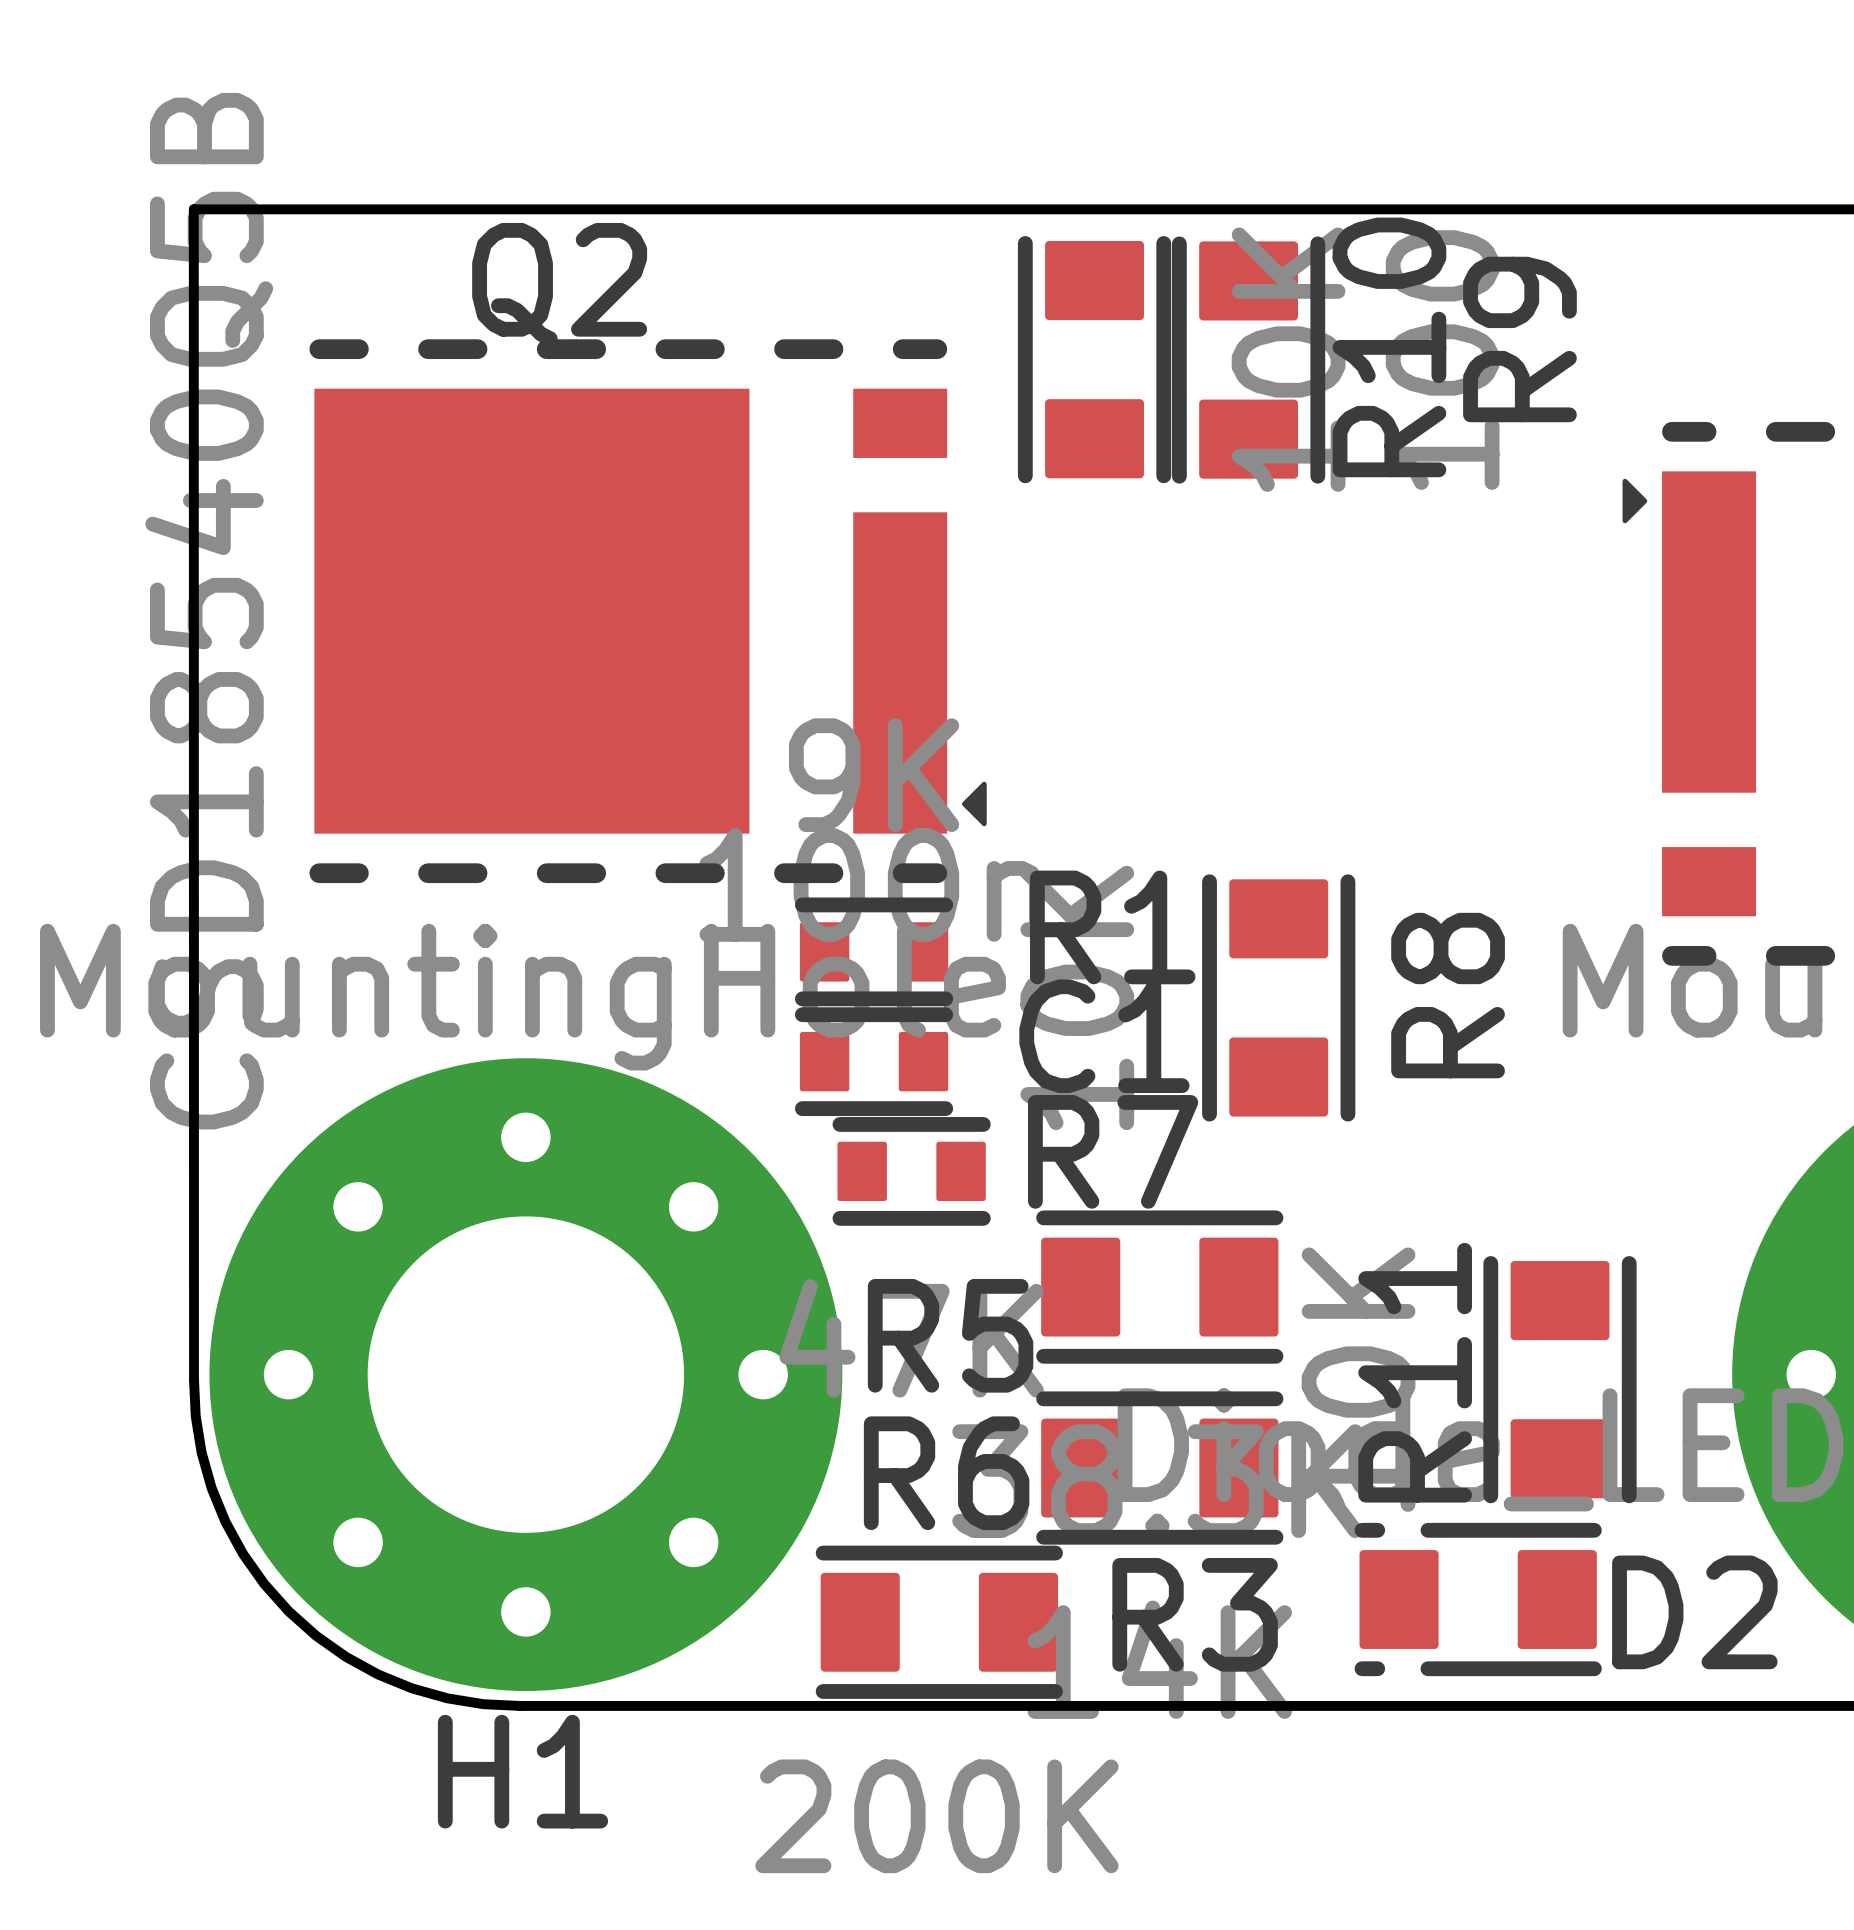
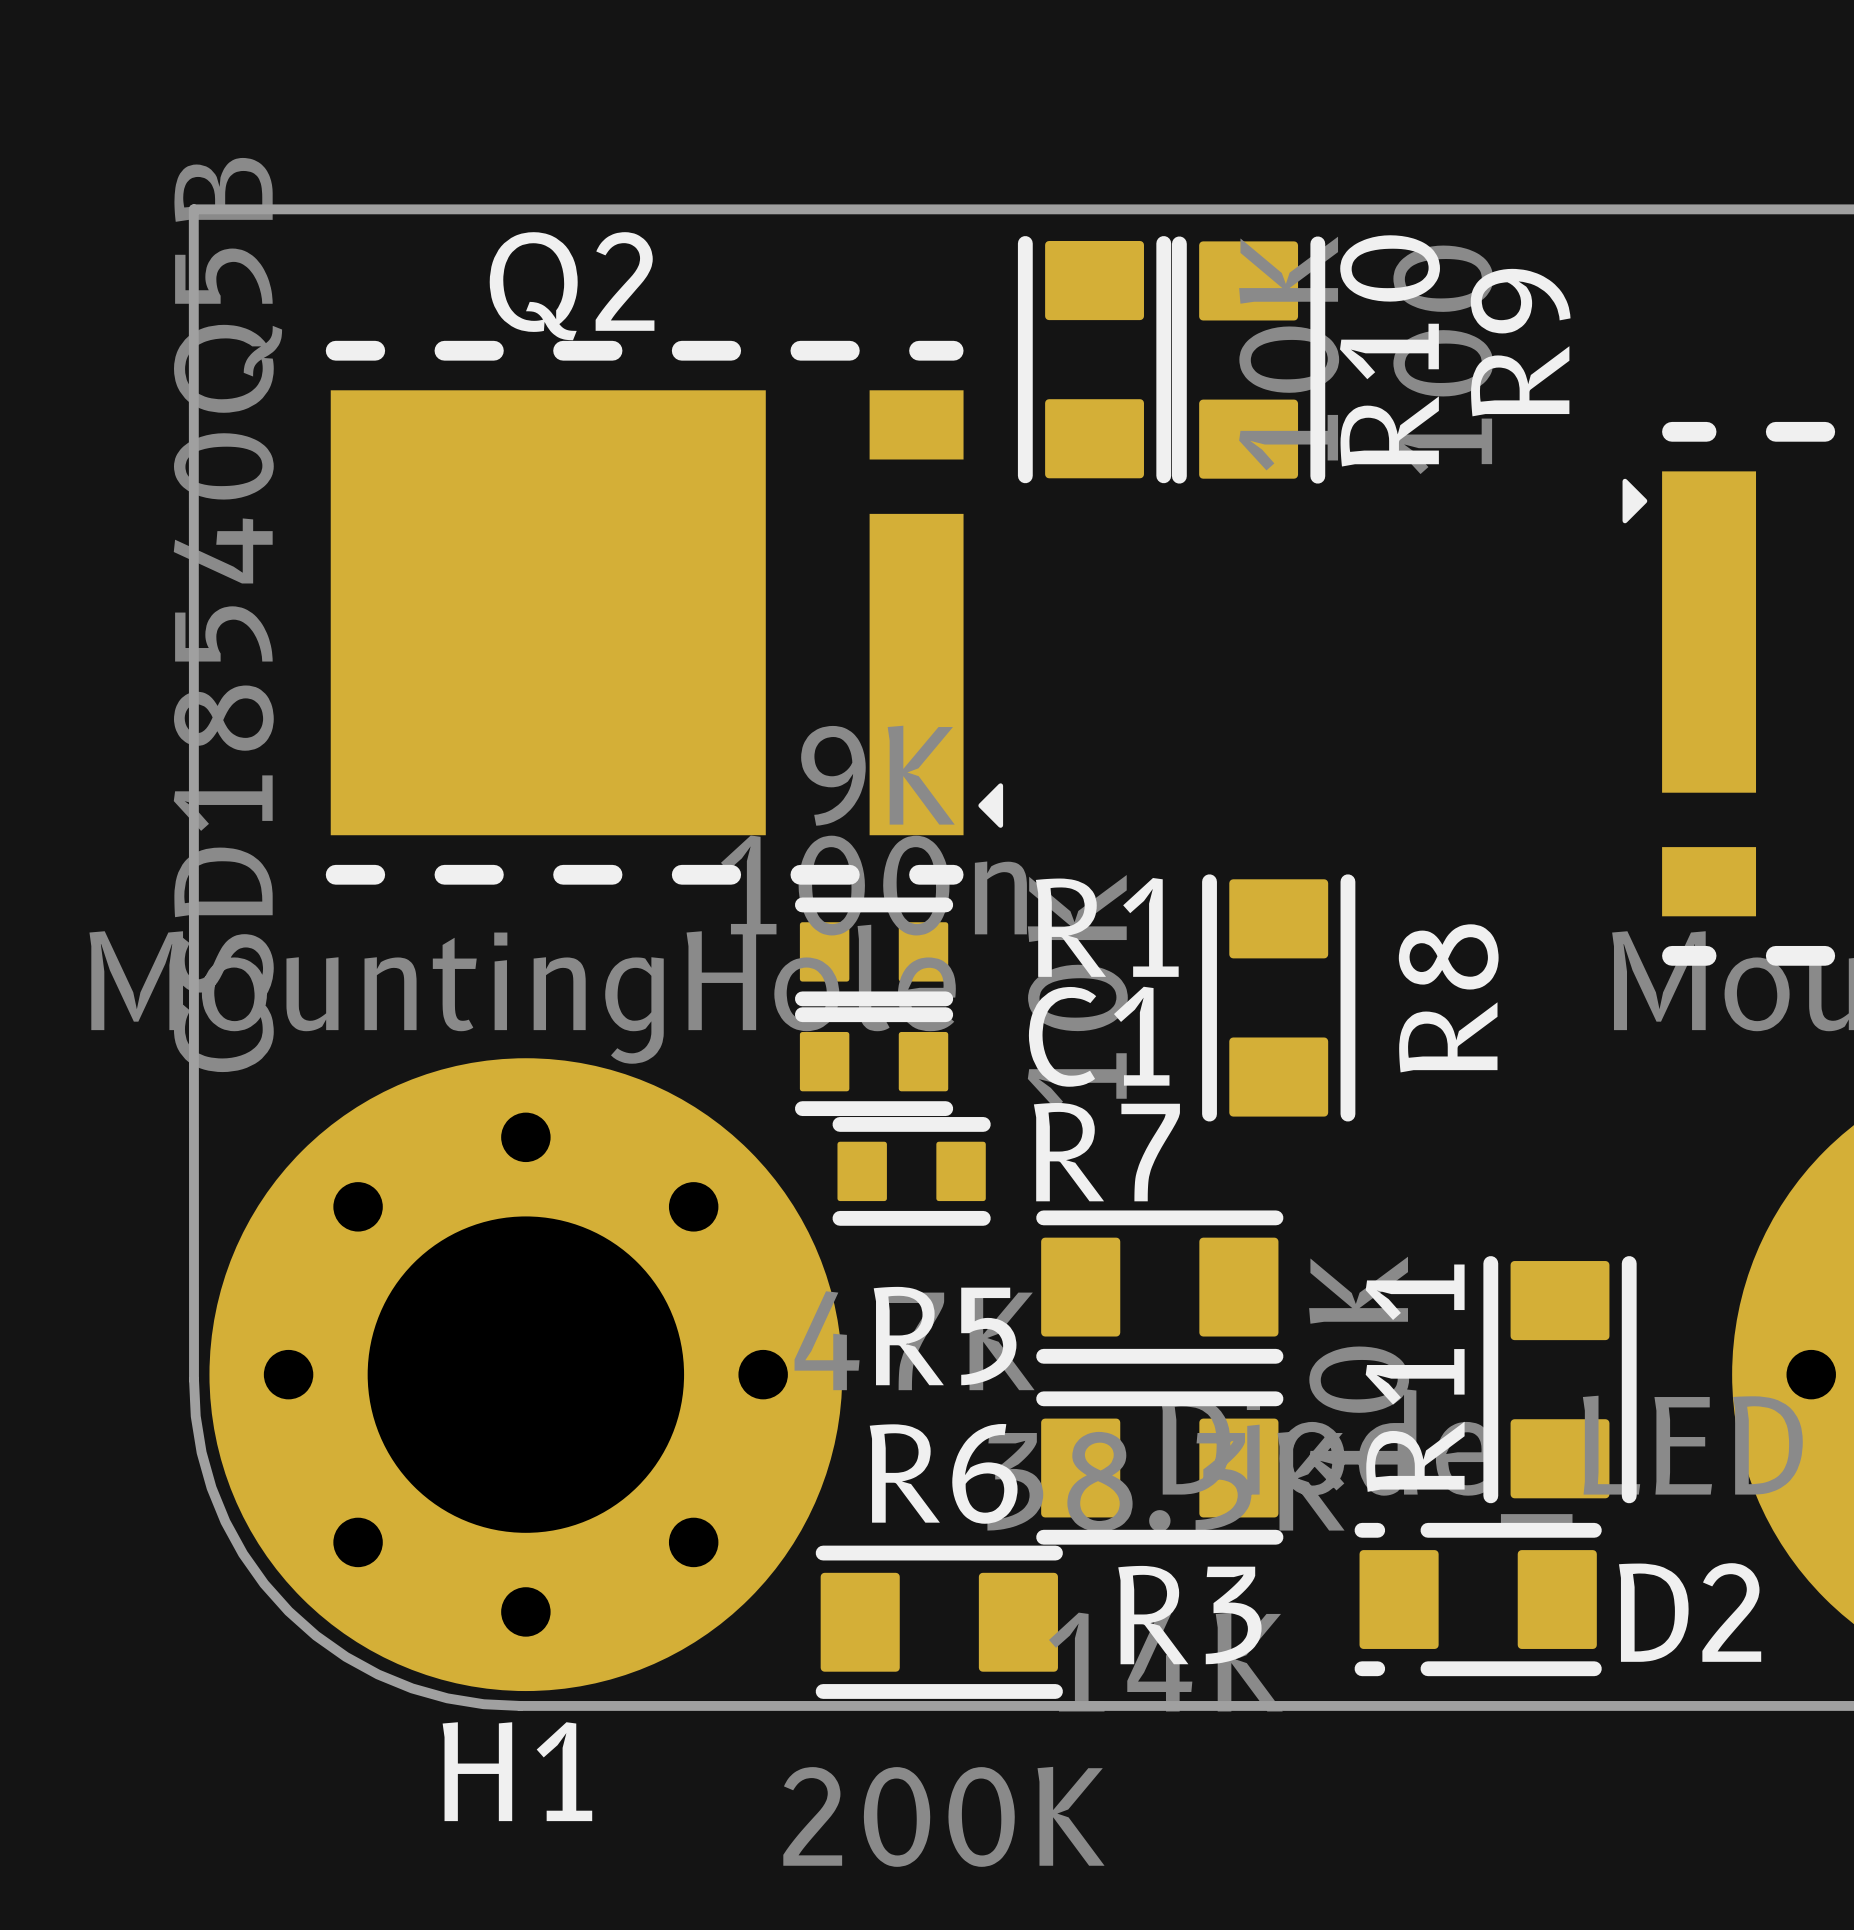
Q2 position: (648, 611) -> (664, 612)

